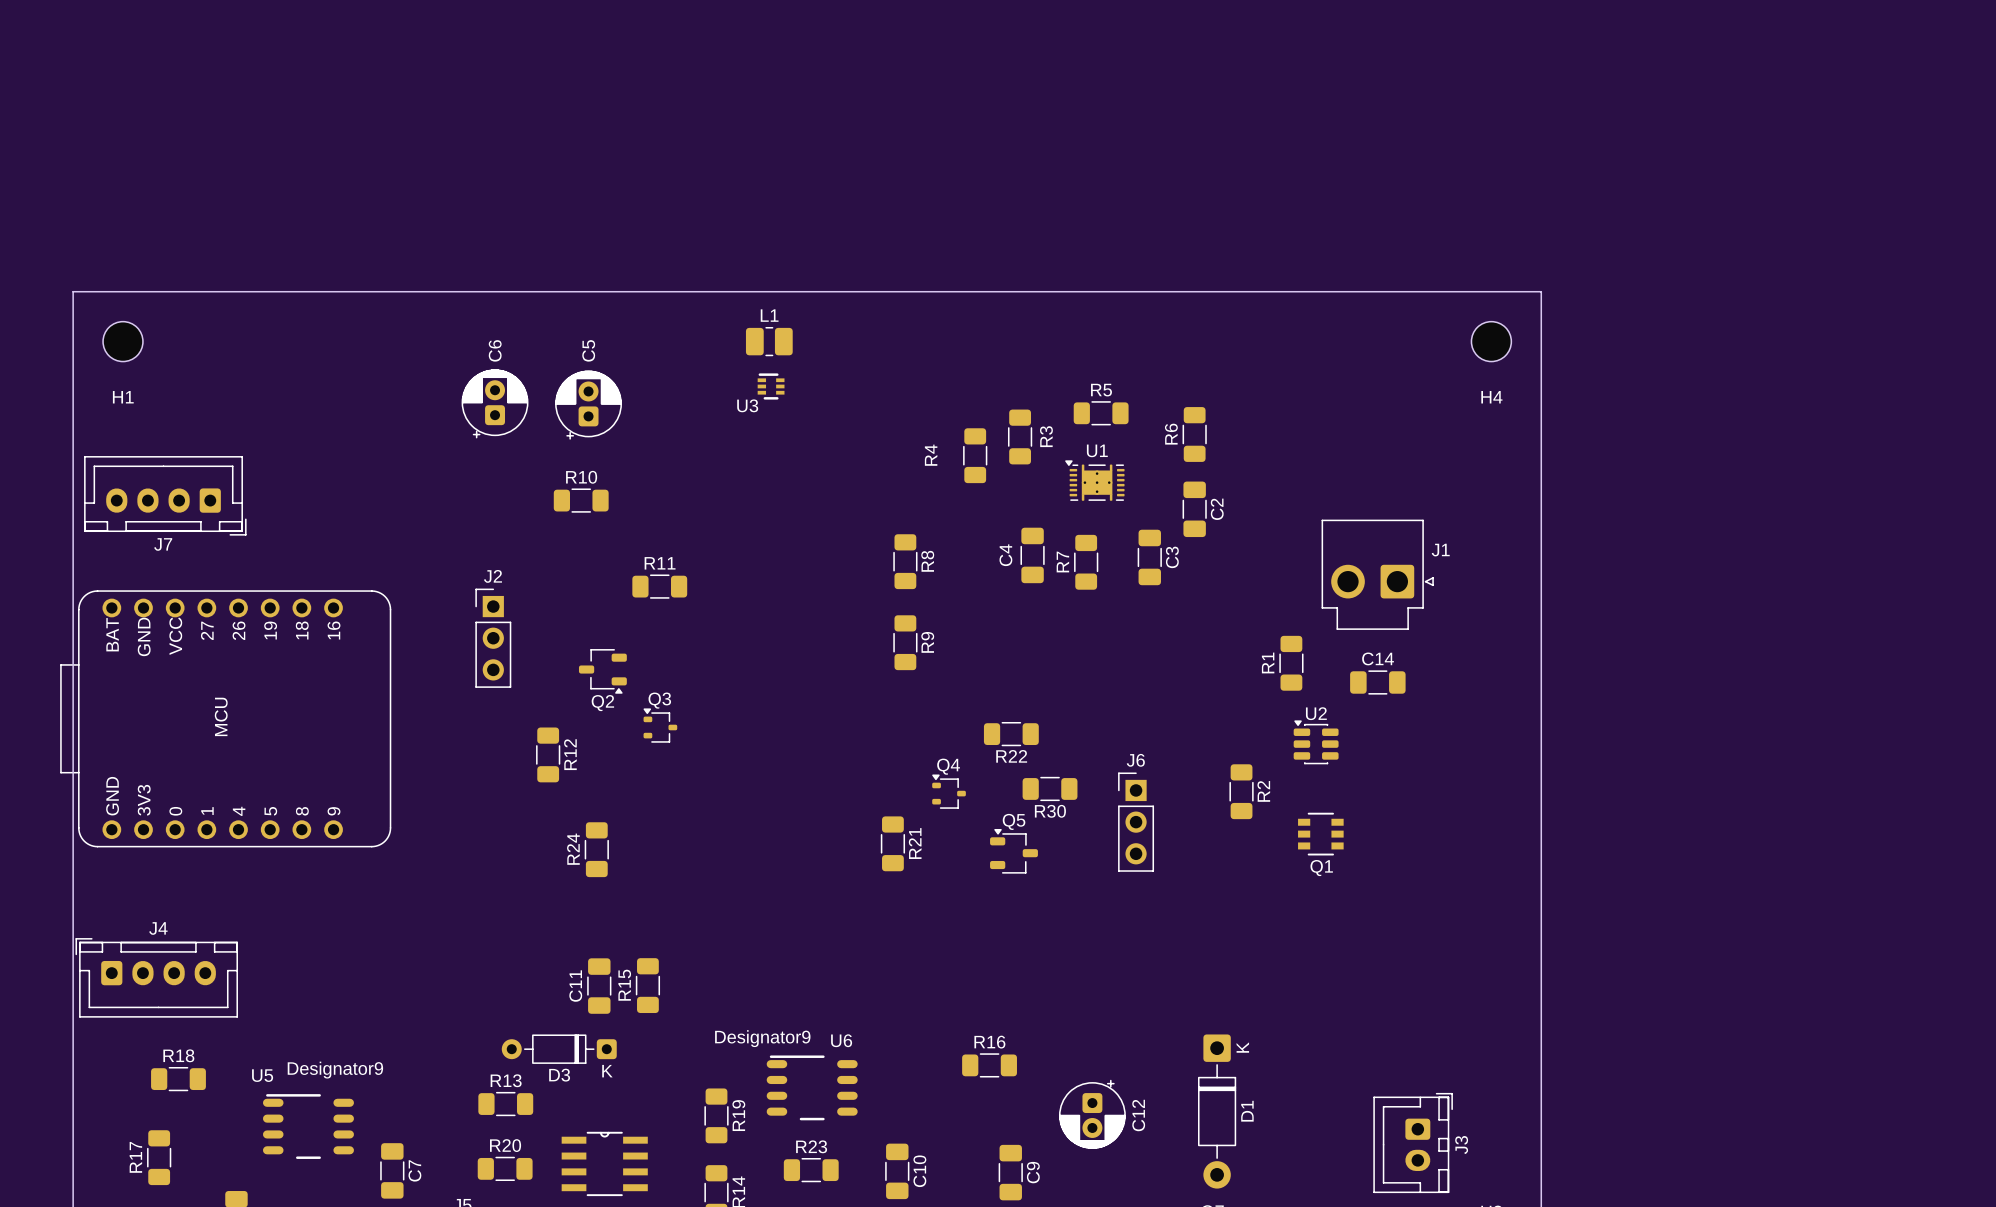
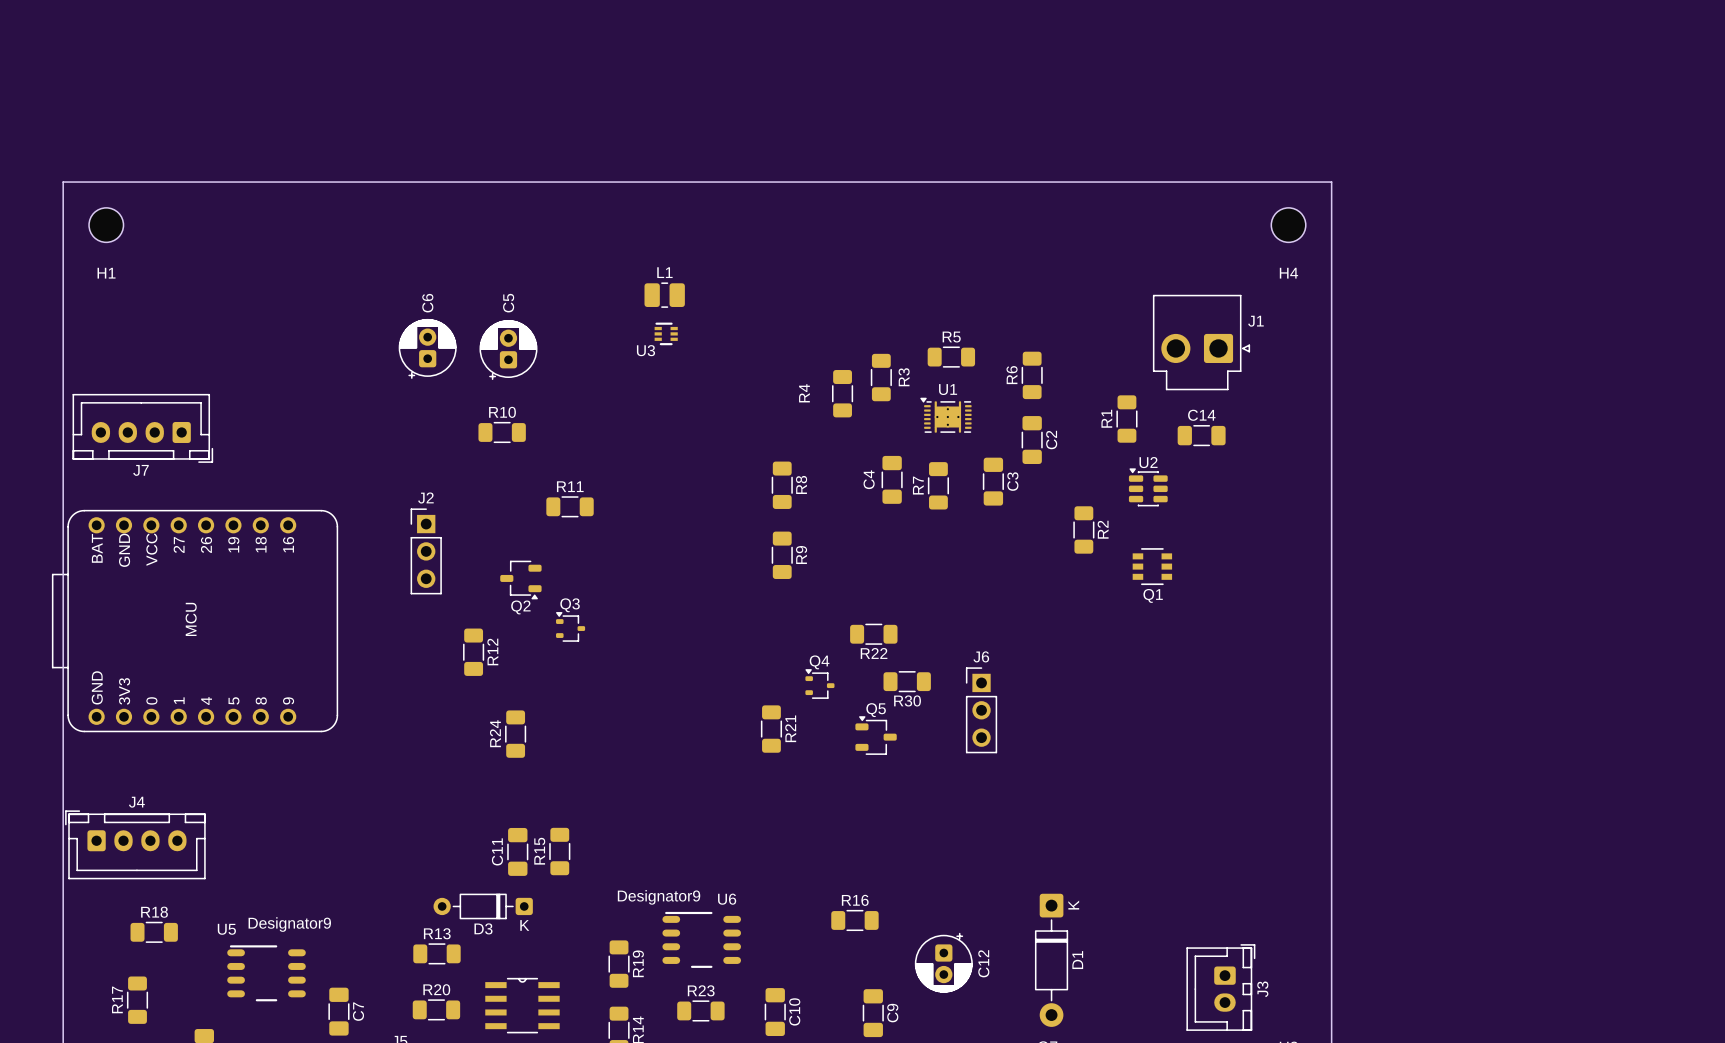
board edge: (73, 291) (1541, 291) -> (63, 252) (63, 182) (1331, 182) (1331, 252)
H1 position: (123, 341) -> (106, 225)
H4 position: (1491, 341) -> (1288, 225)
J1 position: (1377, 574) -> (1201, 342)
R1 position: (1291, 663) -> (1126, 419)
C14 position: (1377, 682) -> (1201, 435)
U2 position: (1316, 742) -> (1148, 487)
R2 position: (1241, 791) -> (1083, 529)
Q1 position: (1320, 834) -> (1152, 566)

